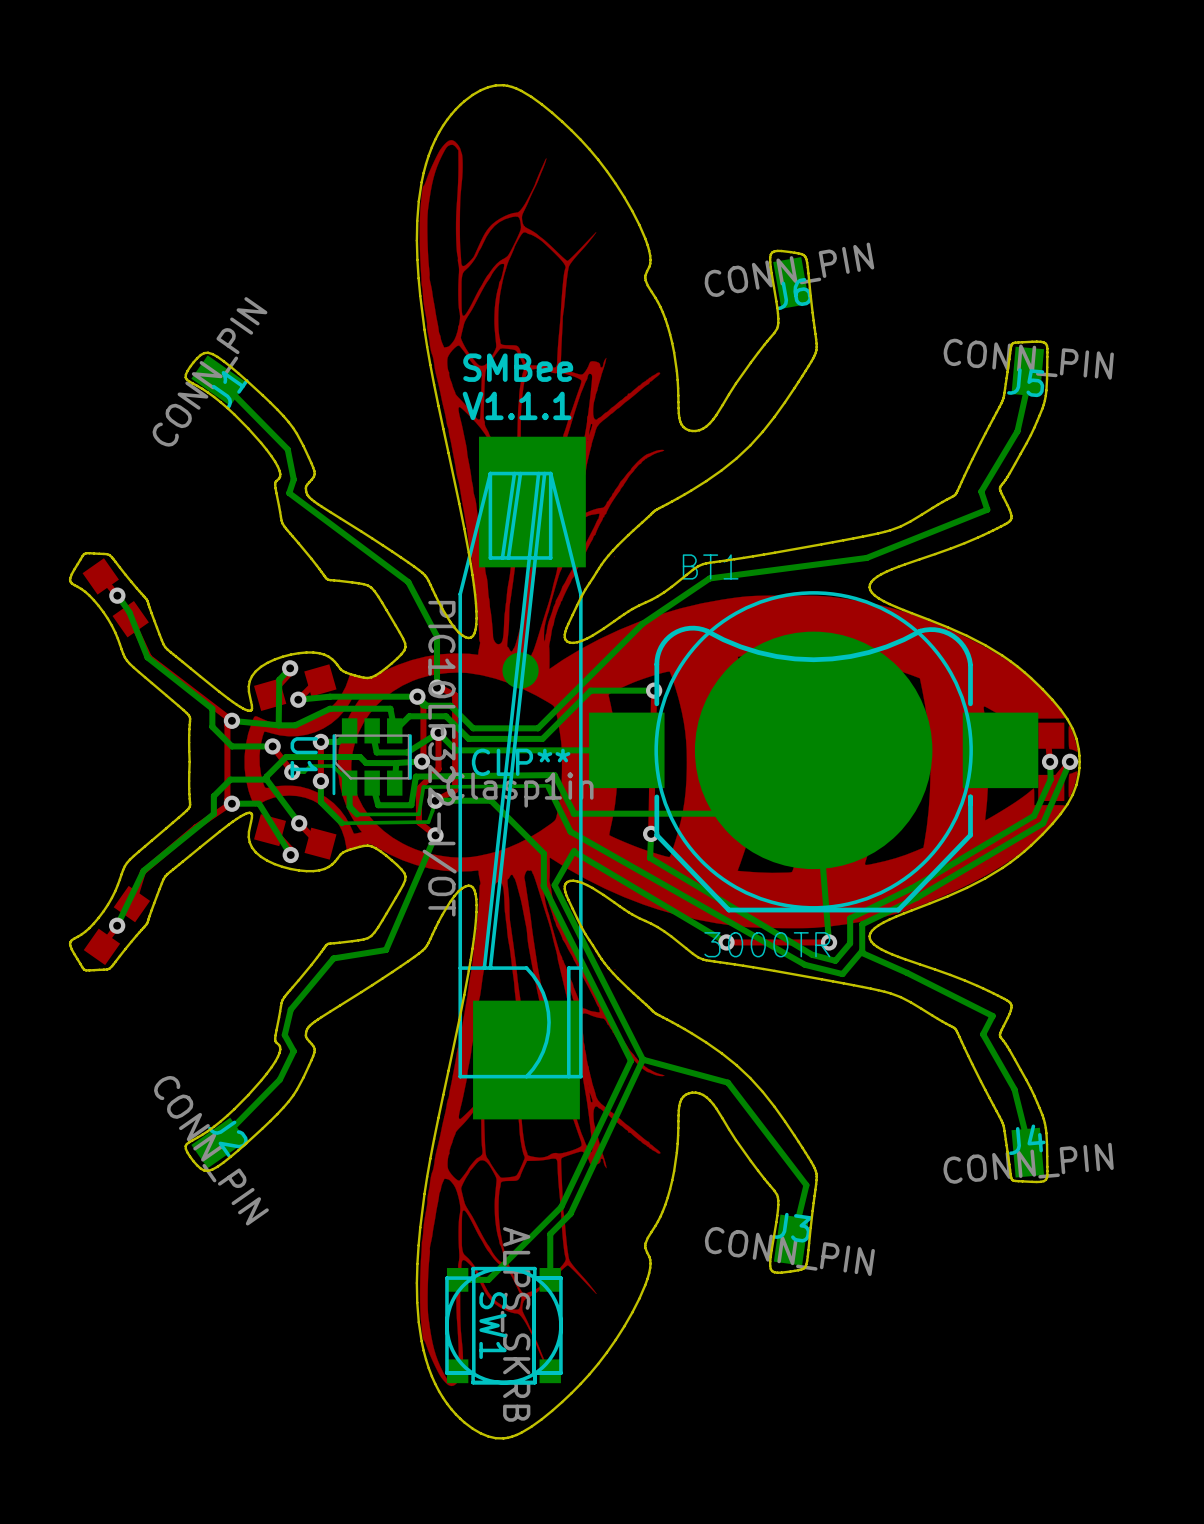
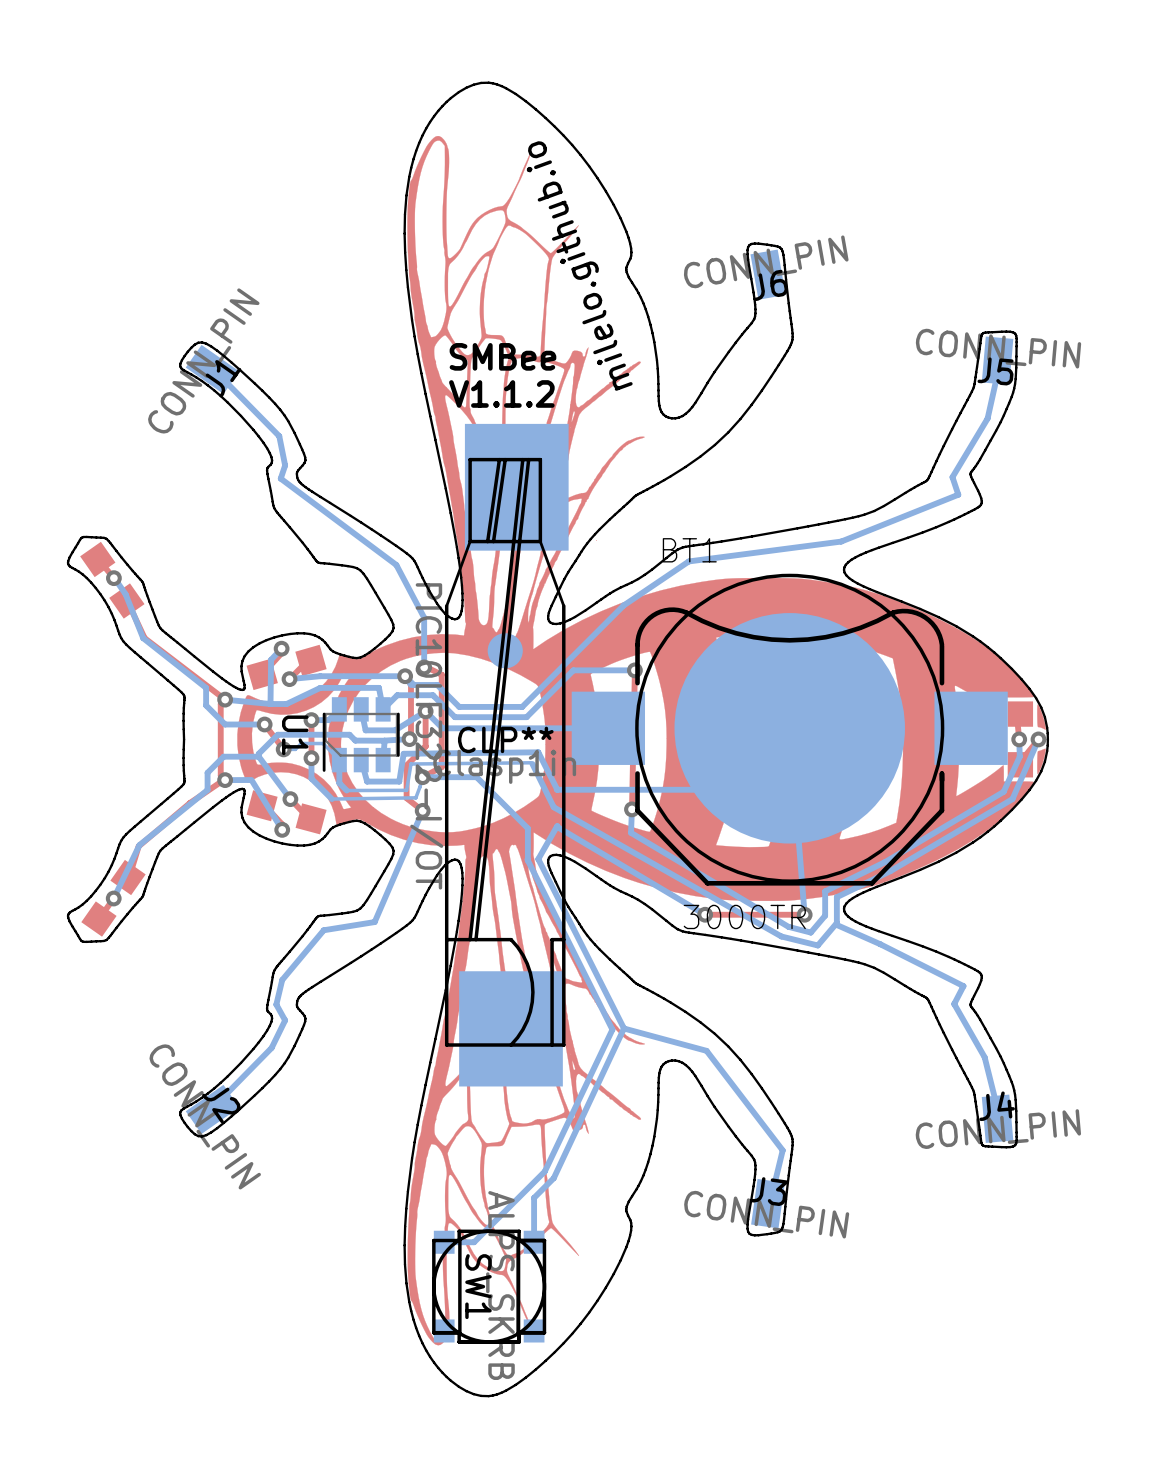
text: none -> milelo.github.io (579, 266)
text: V1.1.1 (517, 405) -> V1.1.2 (501, 393)
CLP** footprint: [458, 436, 586, 1120] -> [444, 423, 569, 1087]

